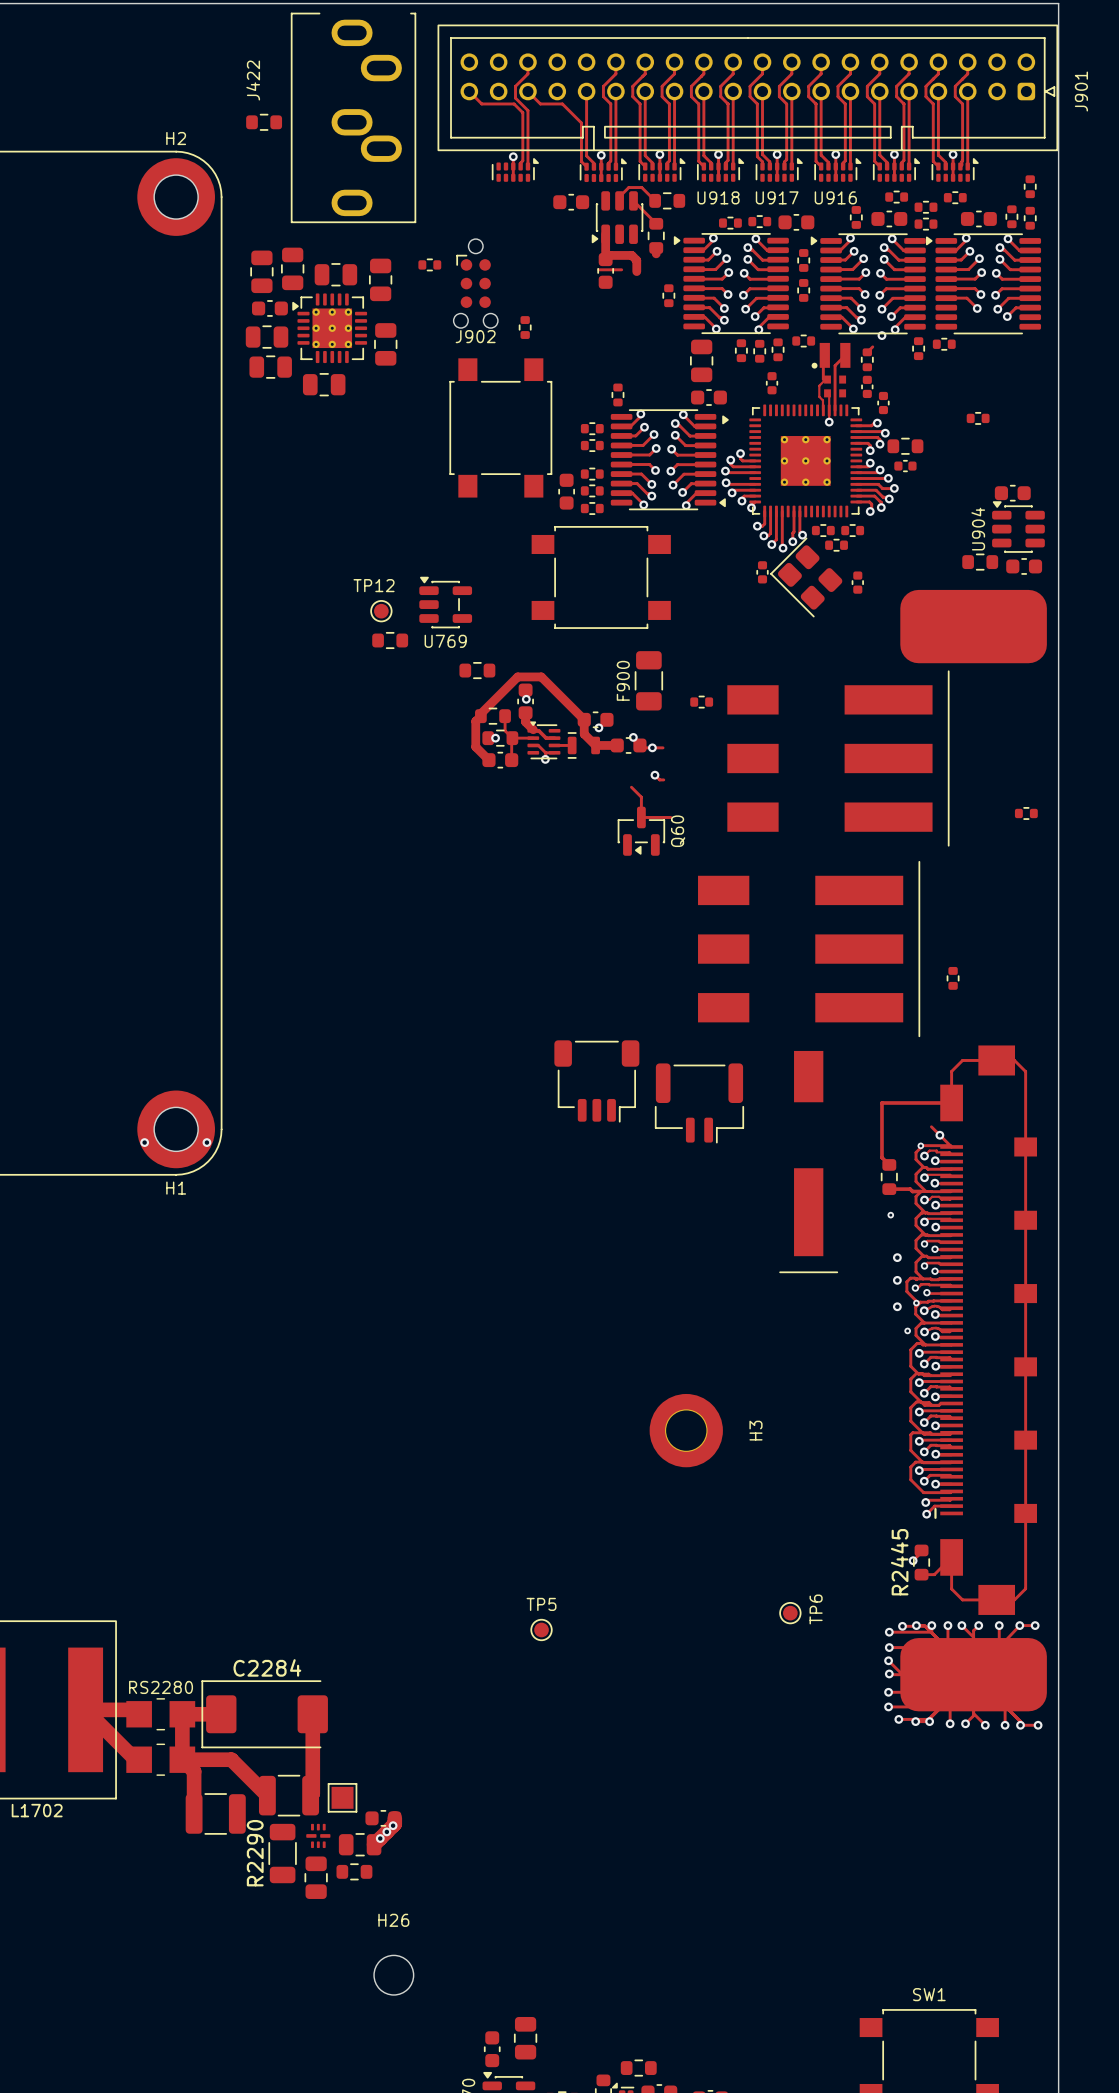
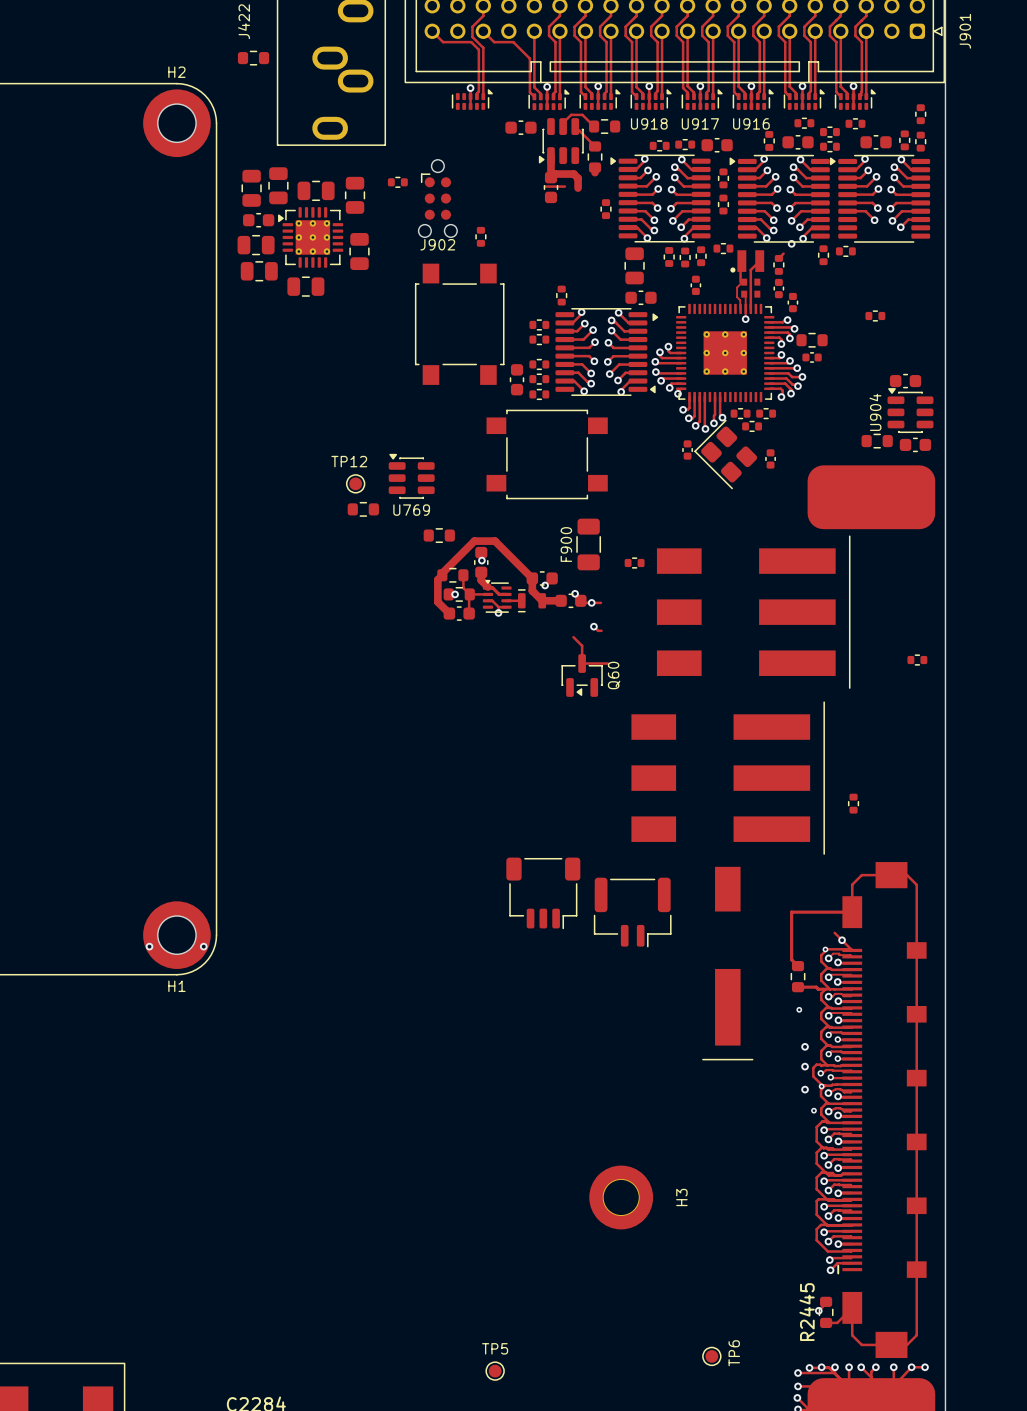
U769 footprint: [419, 576, 473, 629] -> [388, 453, 435, 499]

